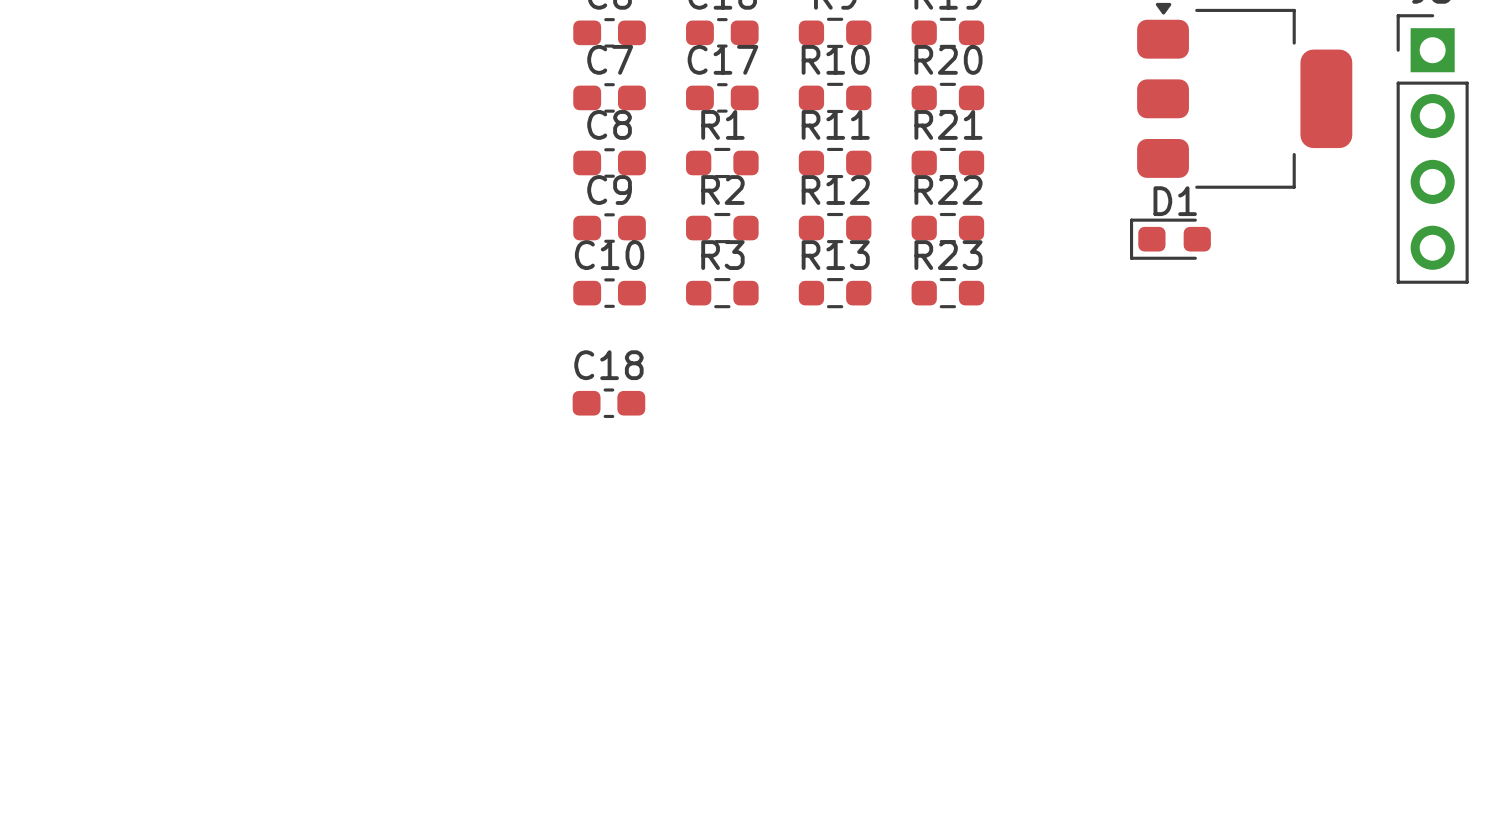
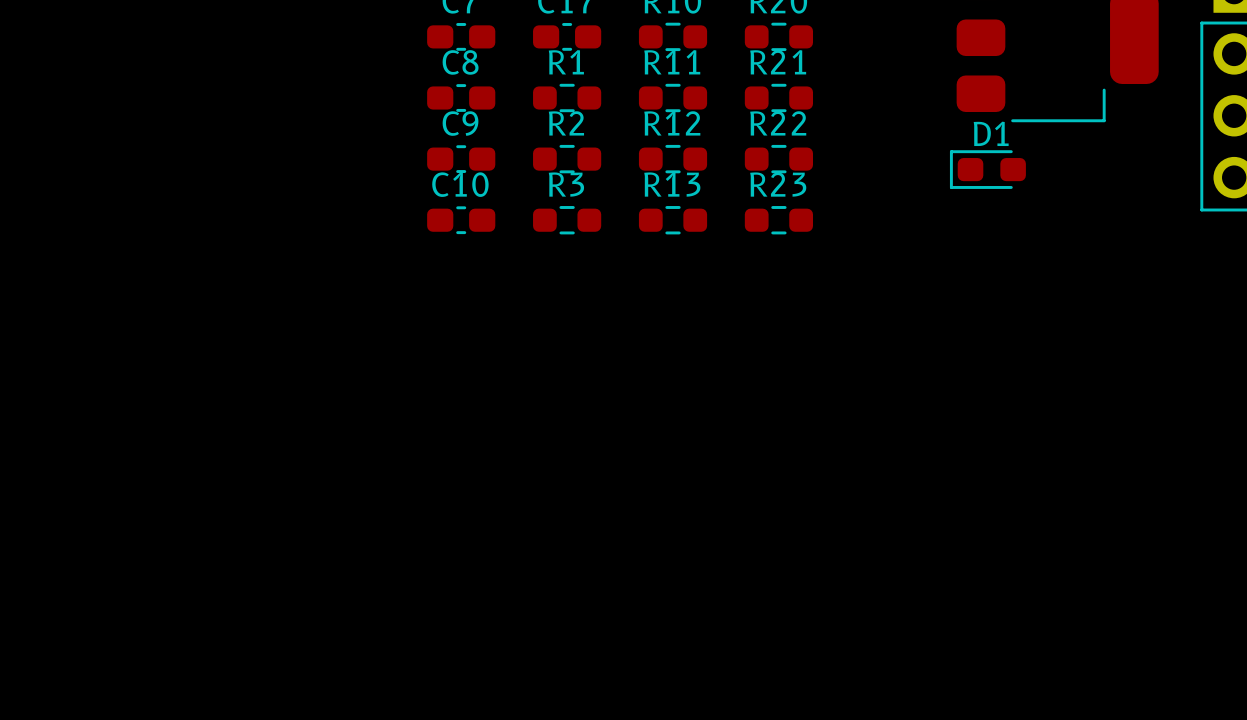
C18: (608, 403) -> none

